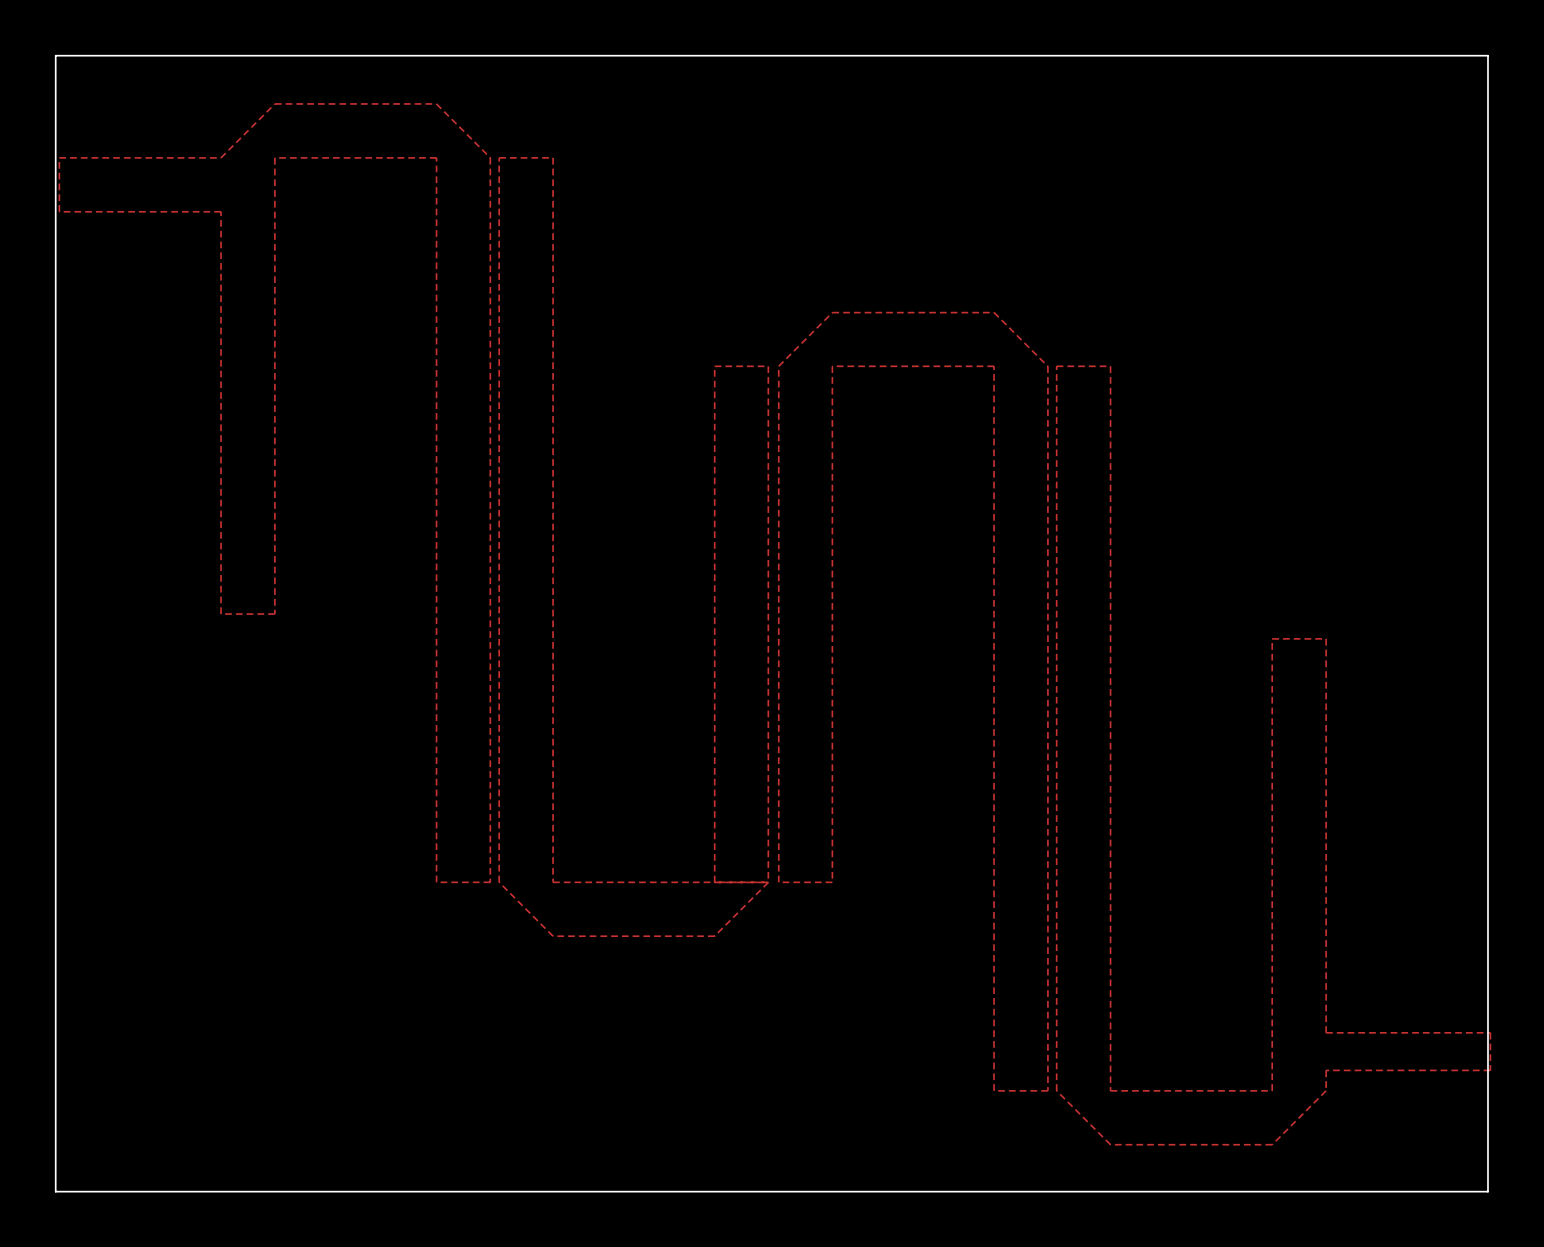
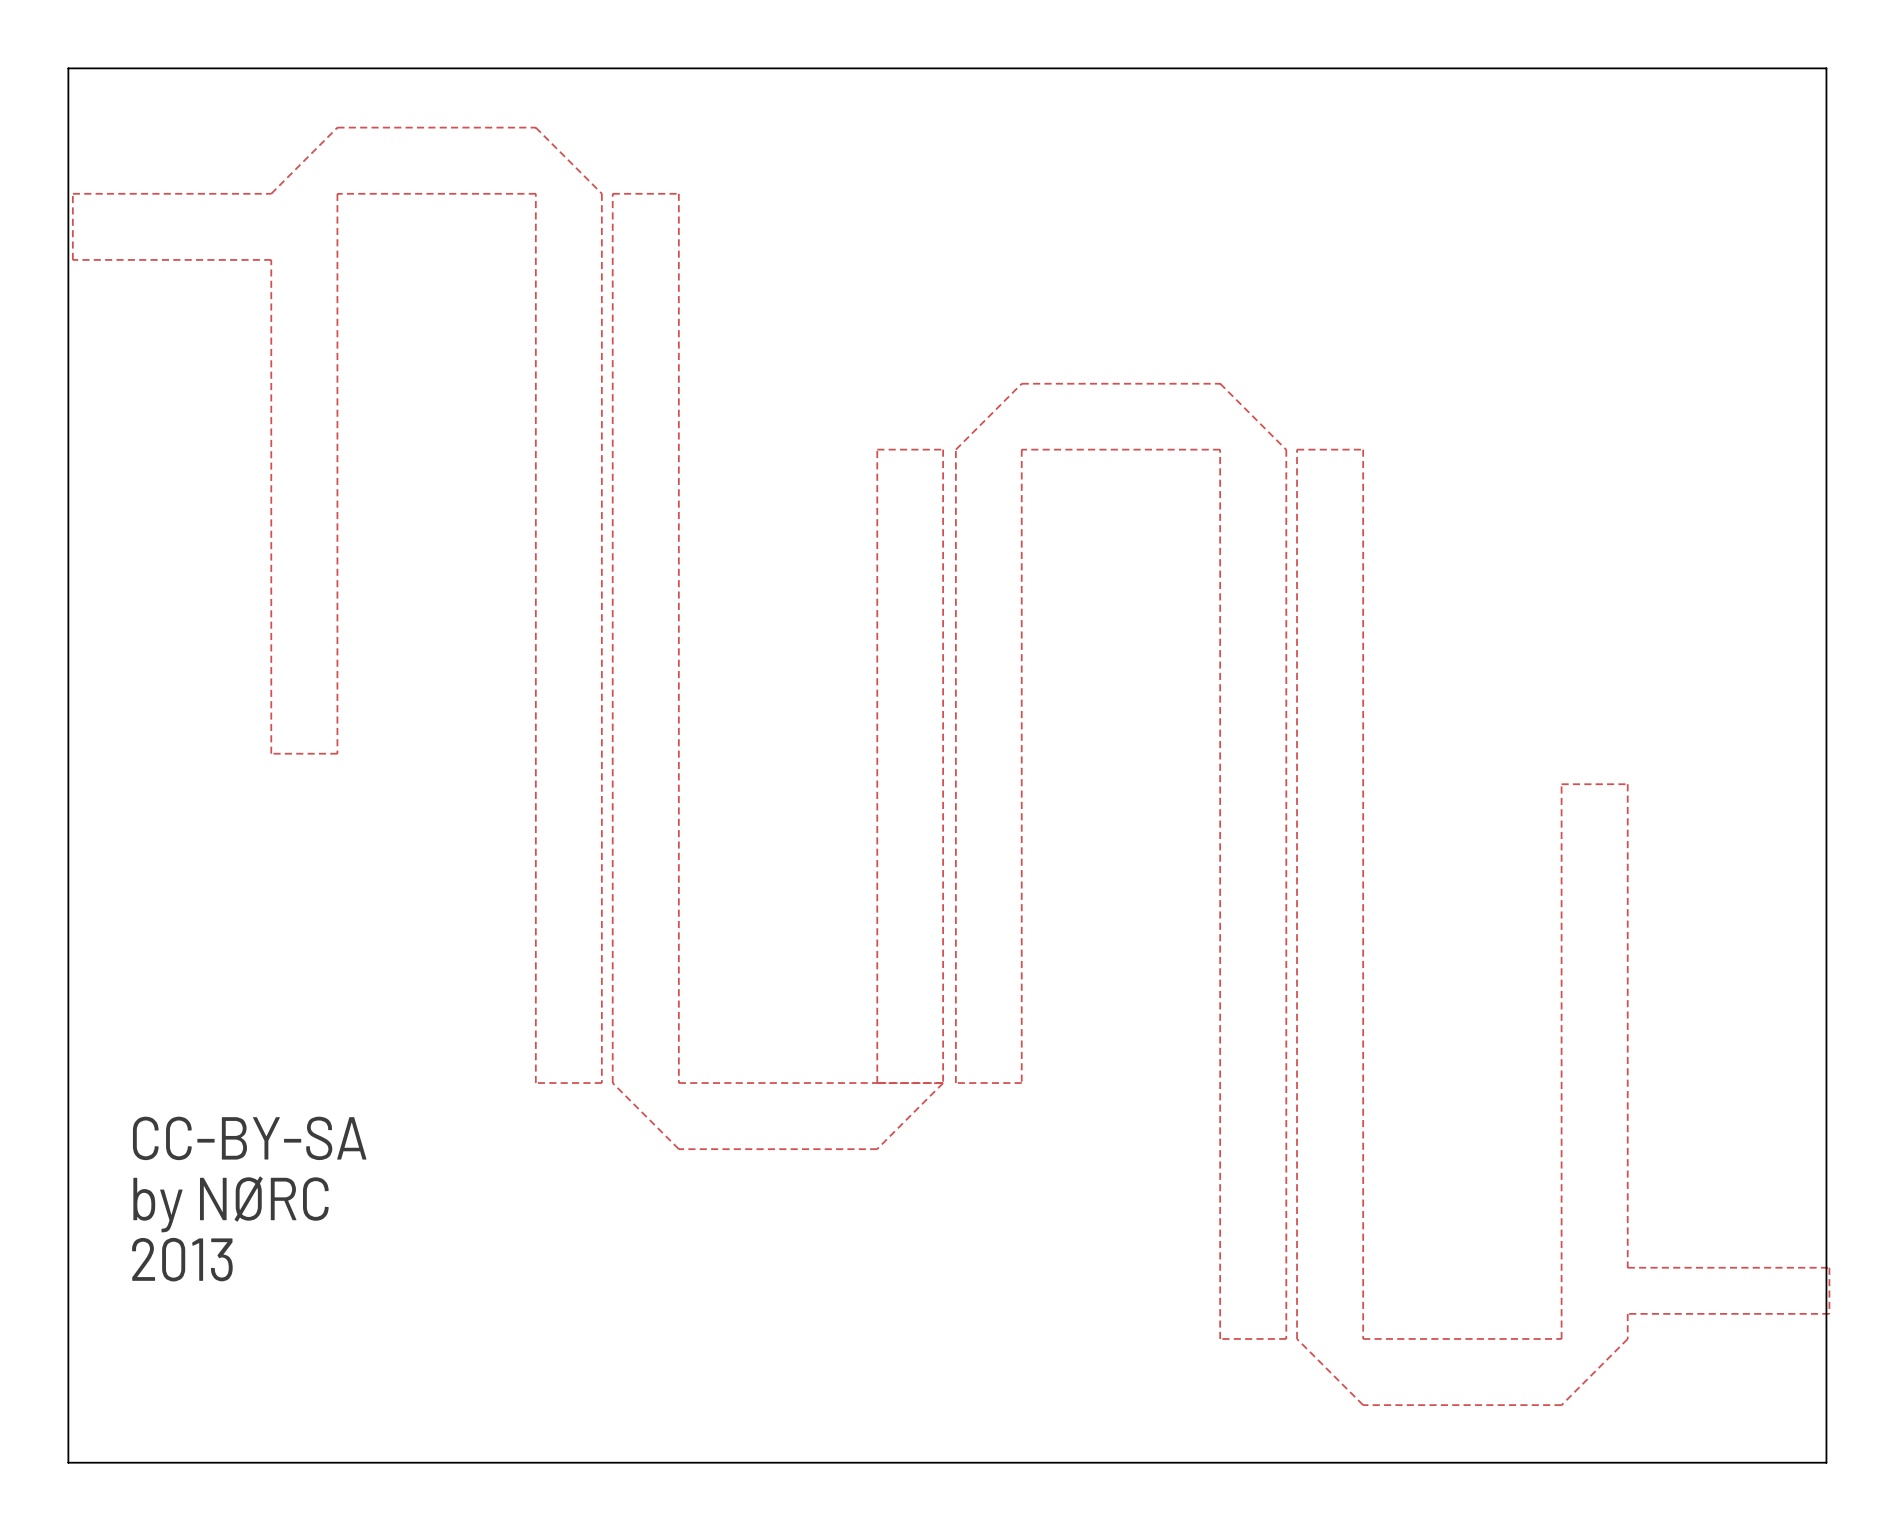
text: none -> CC-BY-SA (249, 1138)
text: none -> by NØRC (231, 1204)
text: none -> 2013 (182, 1259)

